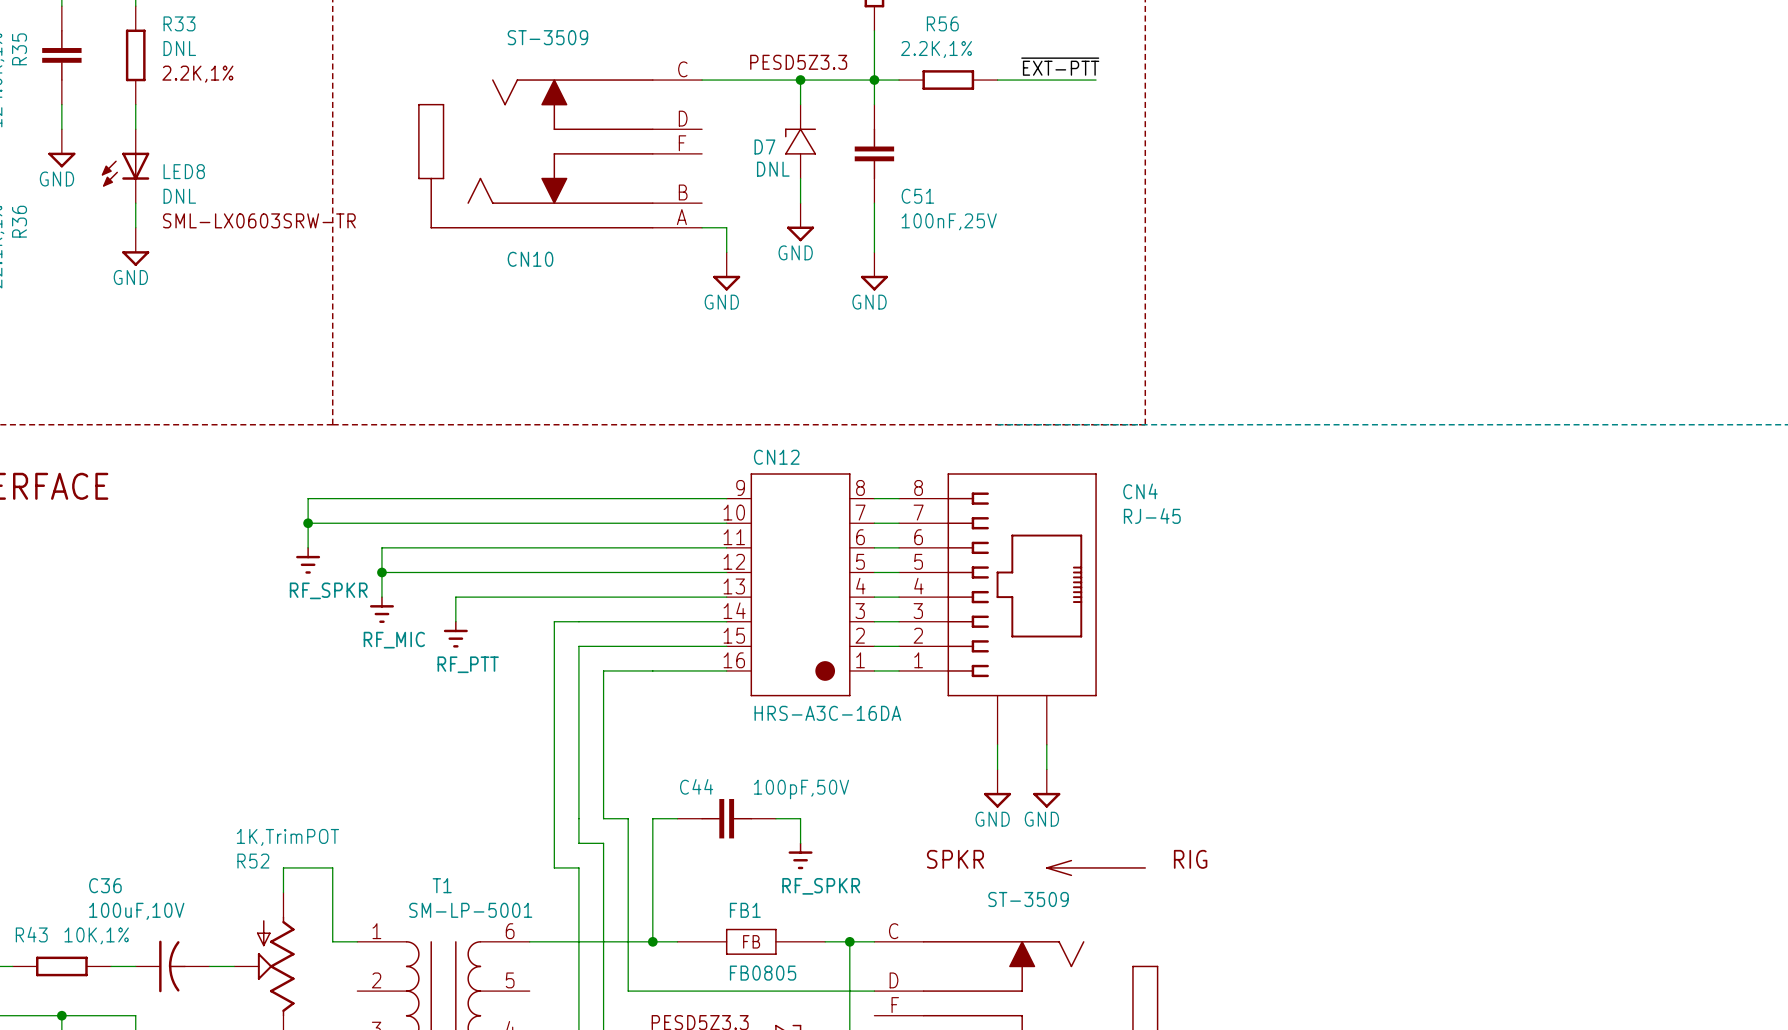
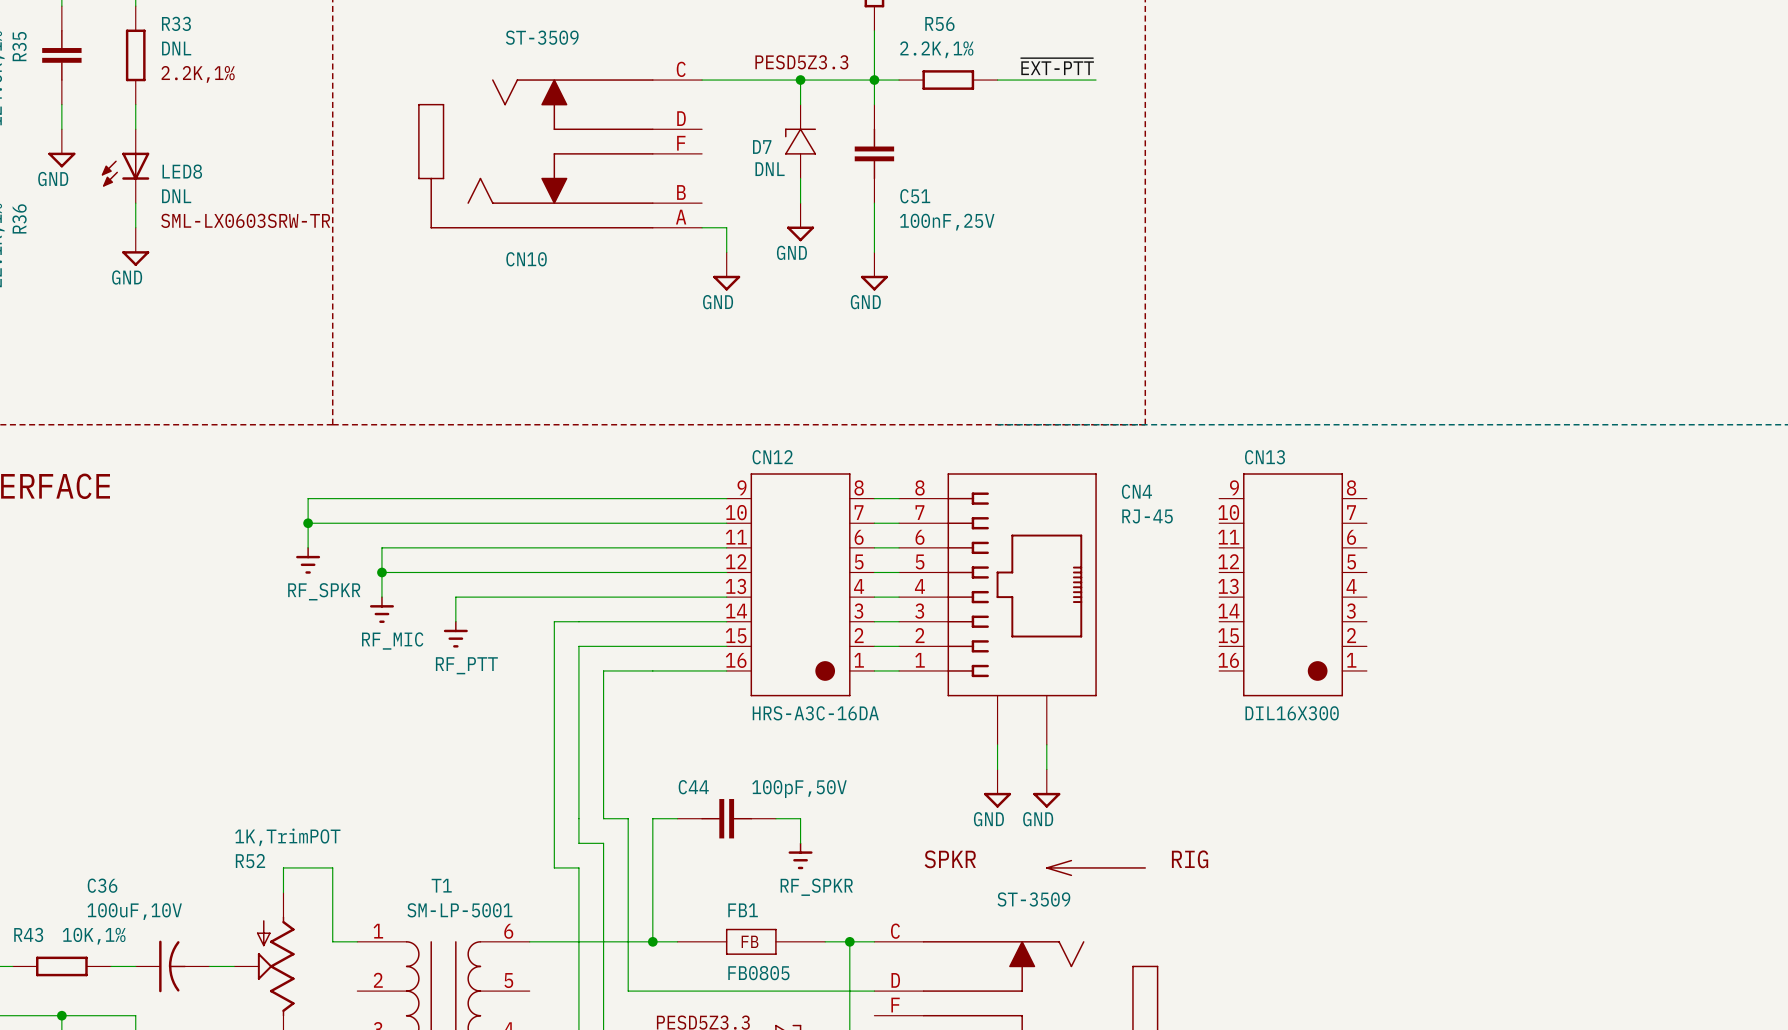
CN13: none -> DIL16X300 (1293, 584)

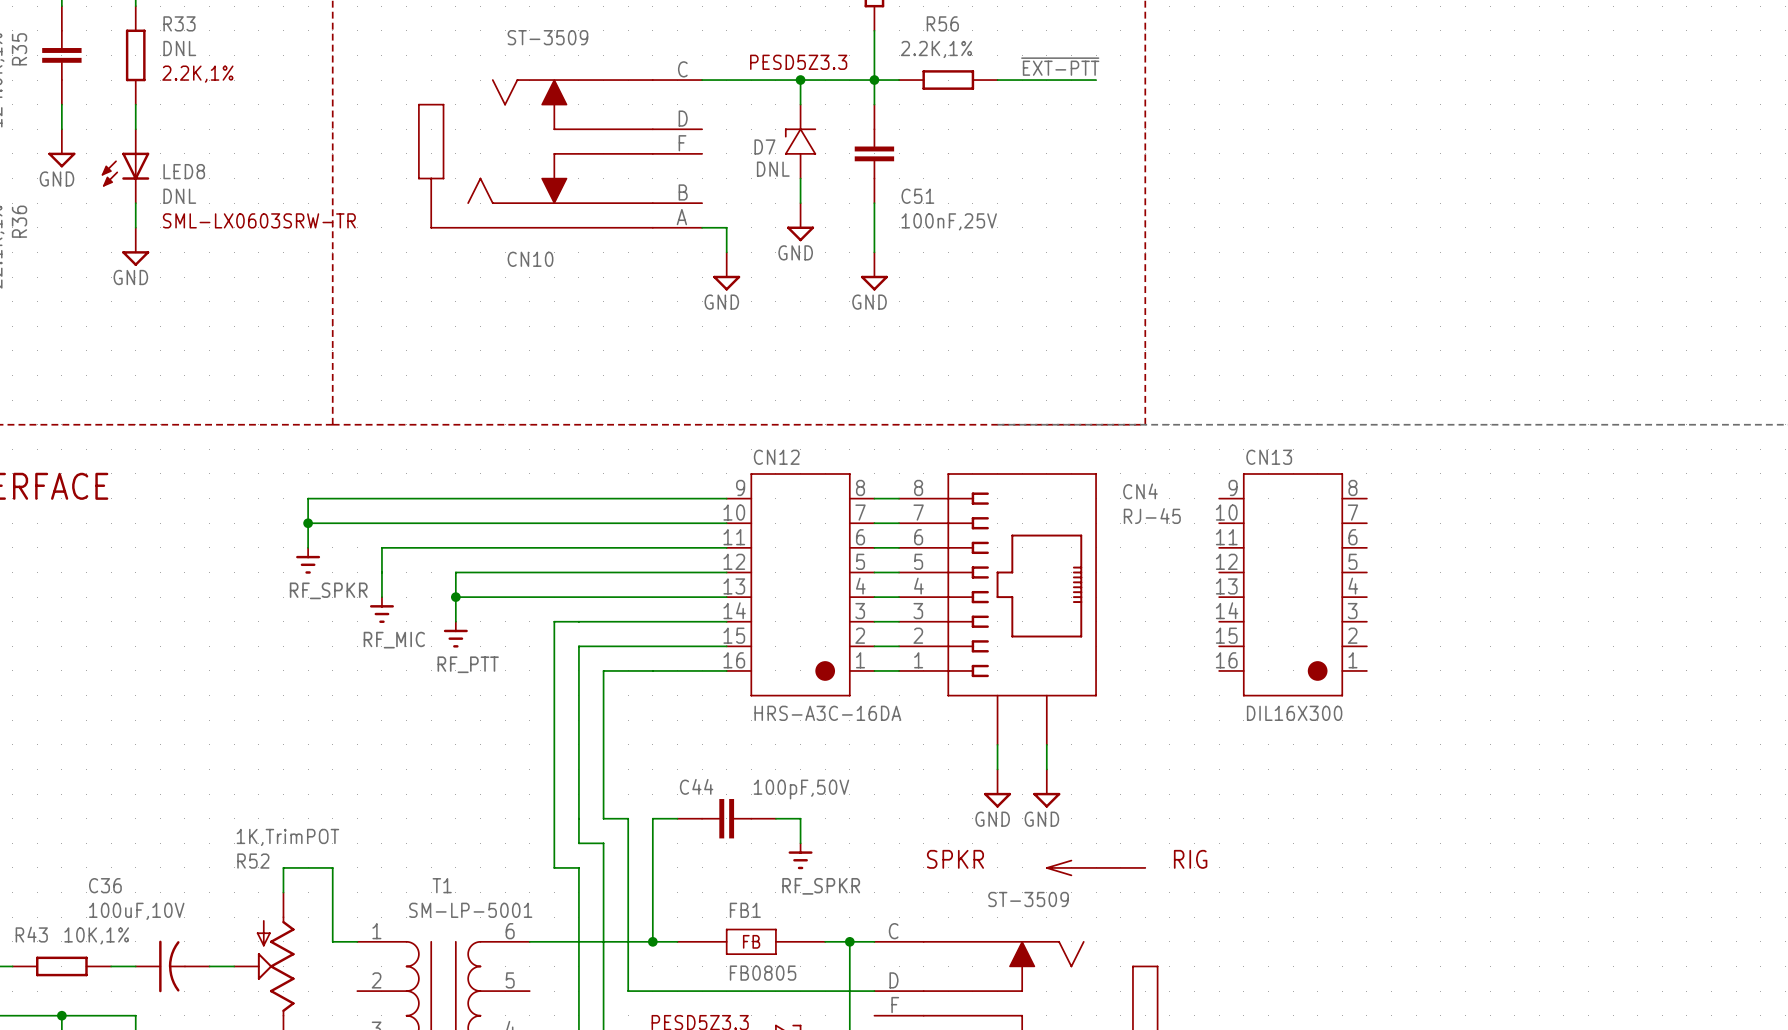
wire: (381, 572) (455, 572) -> (455, 597) (455, 572)
junction: (381, 572) -> none
junction: none -> (455, 597)

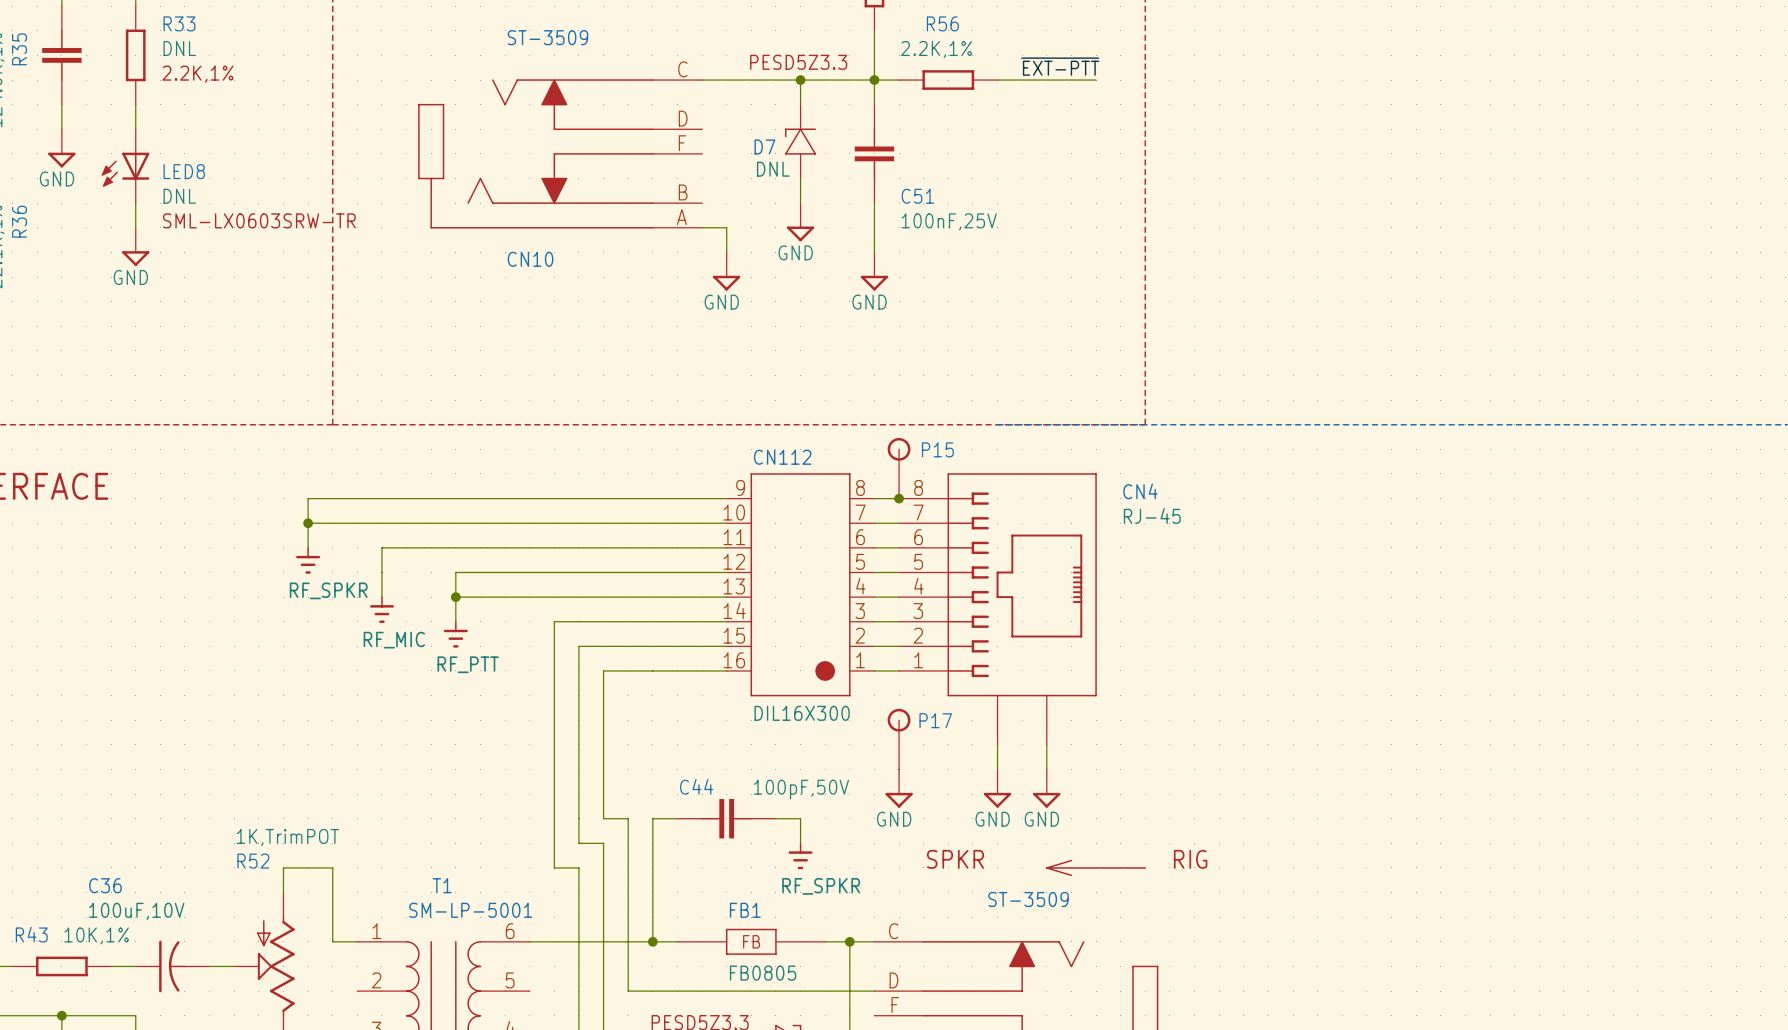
CN12 name: CN12 (776, 457) -> CN112 (782, 457)
P15: none -> (899, 468)
junction: none -> (899, 498)
CN13: DIL16X300 (1293, 584) -> none
CN12 value: HRS-A3C-16DA (827, 713) -> DIL16X300 (802, 713)
P17: none -> (899, 739)
power symbol: none -> GND (899, 788)

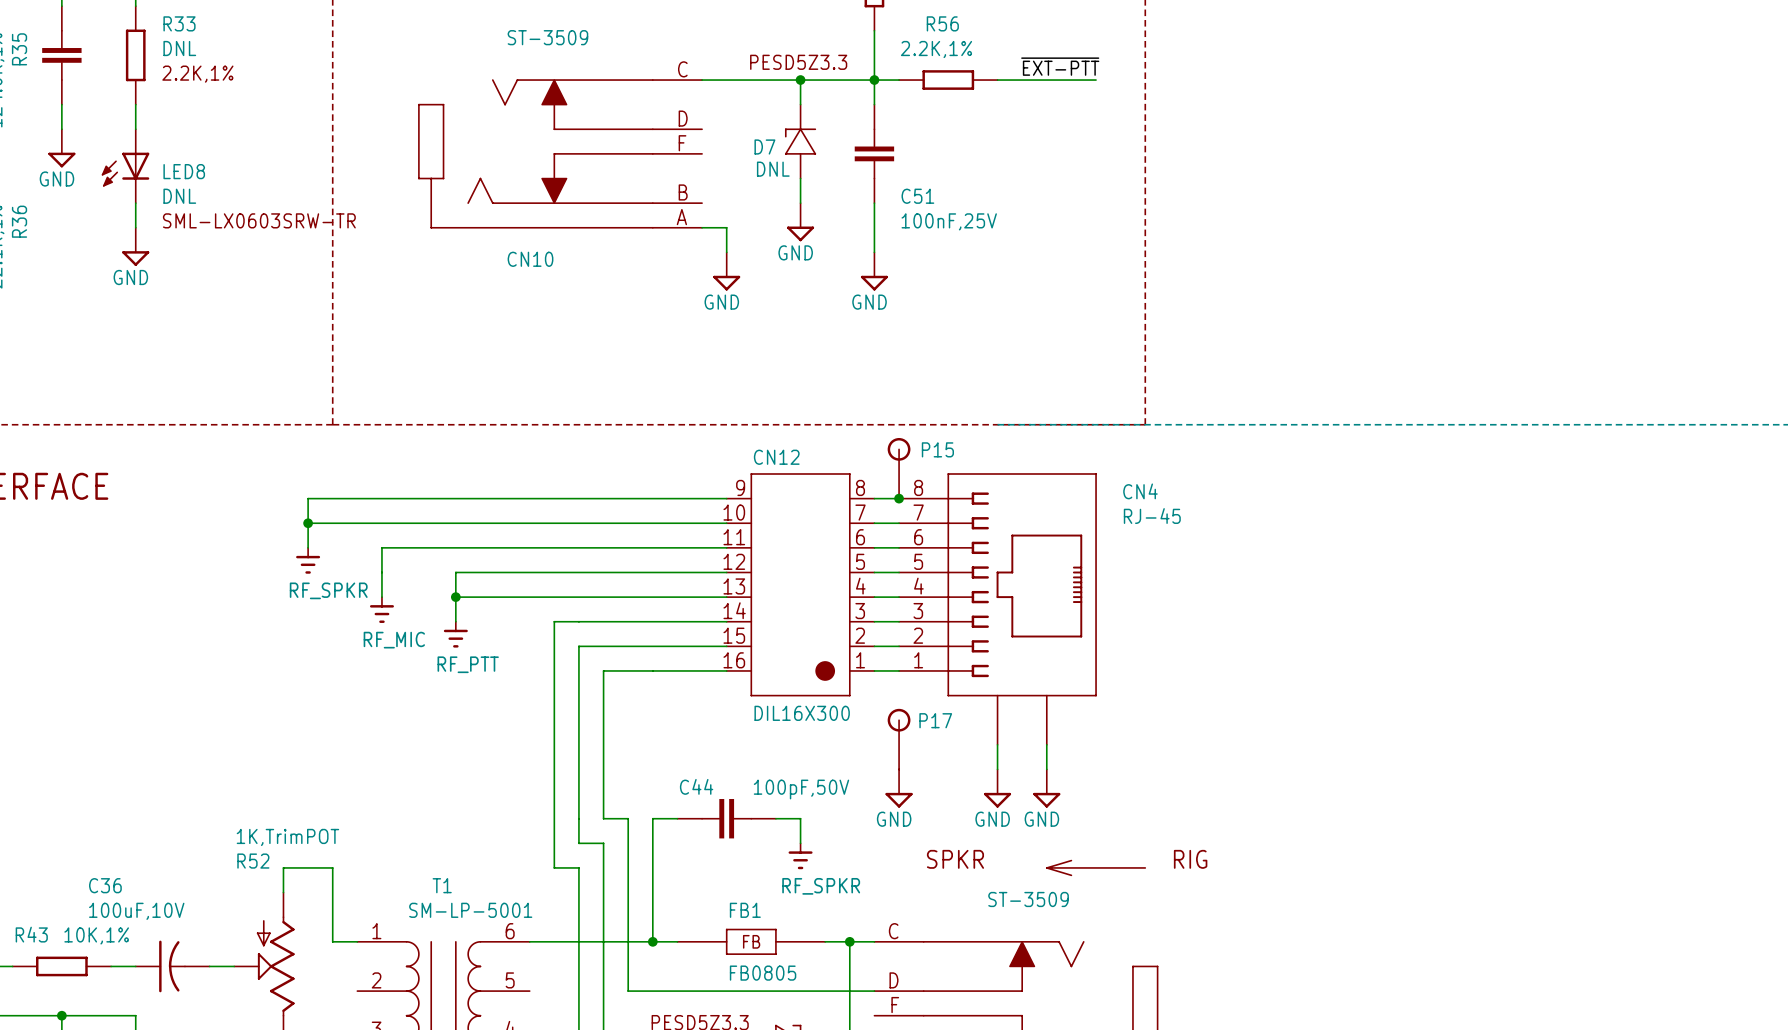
CN112 name: CN112 (782, 457) -> CN12 (776, 457)

